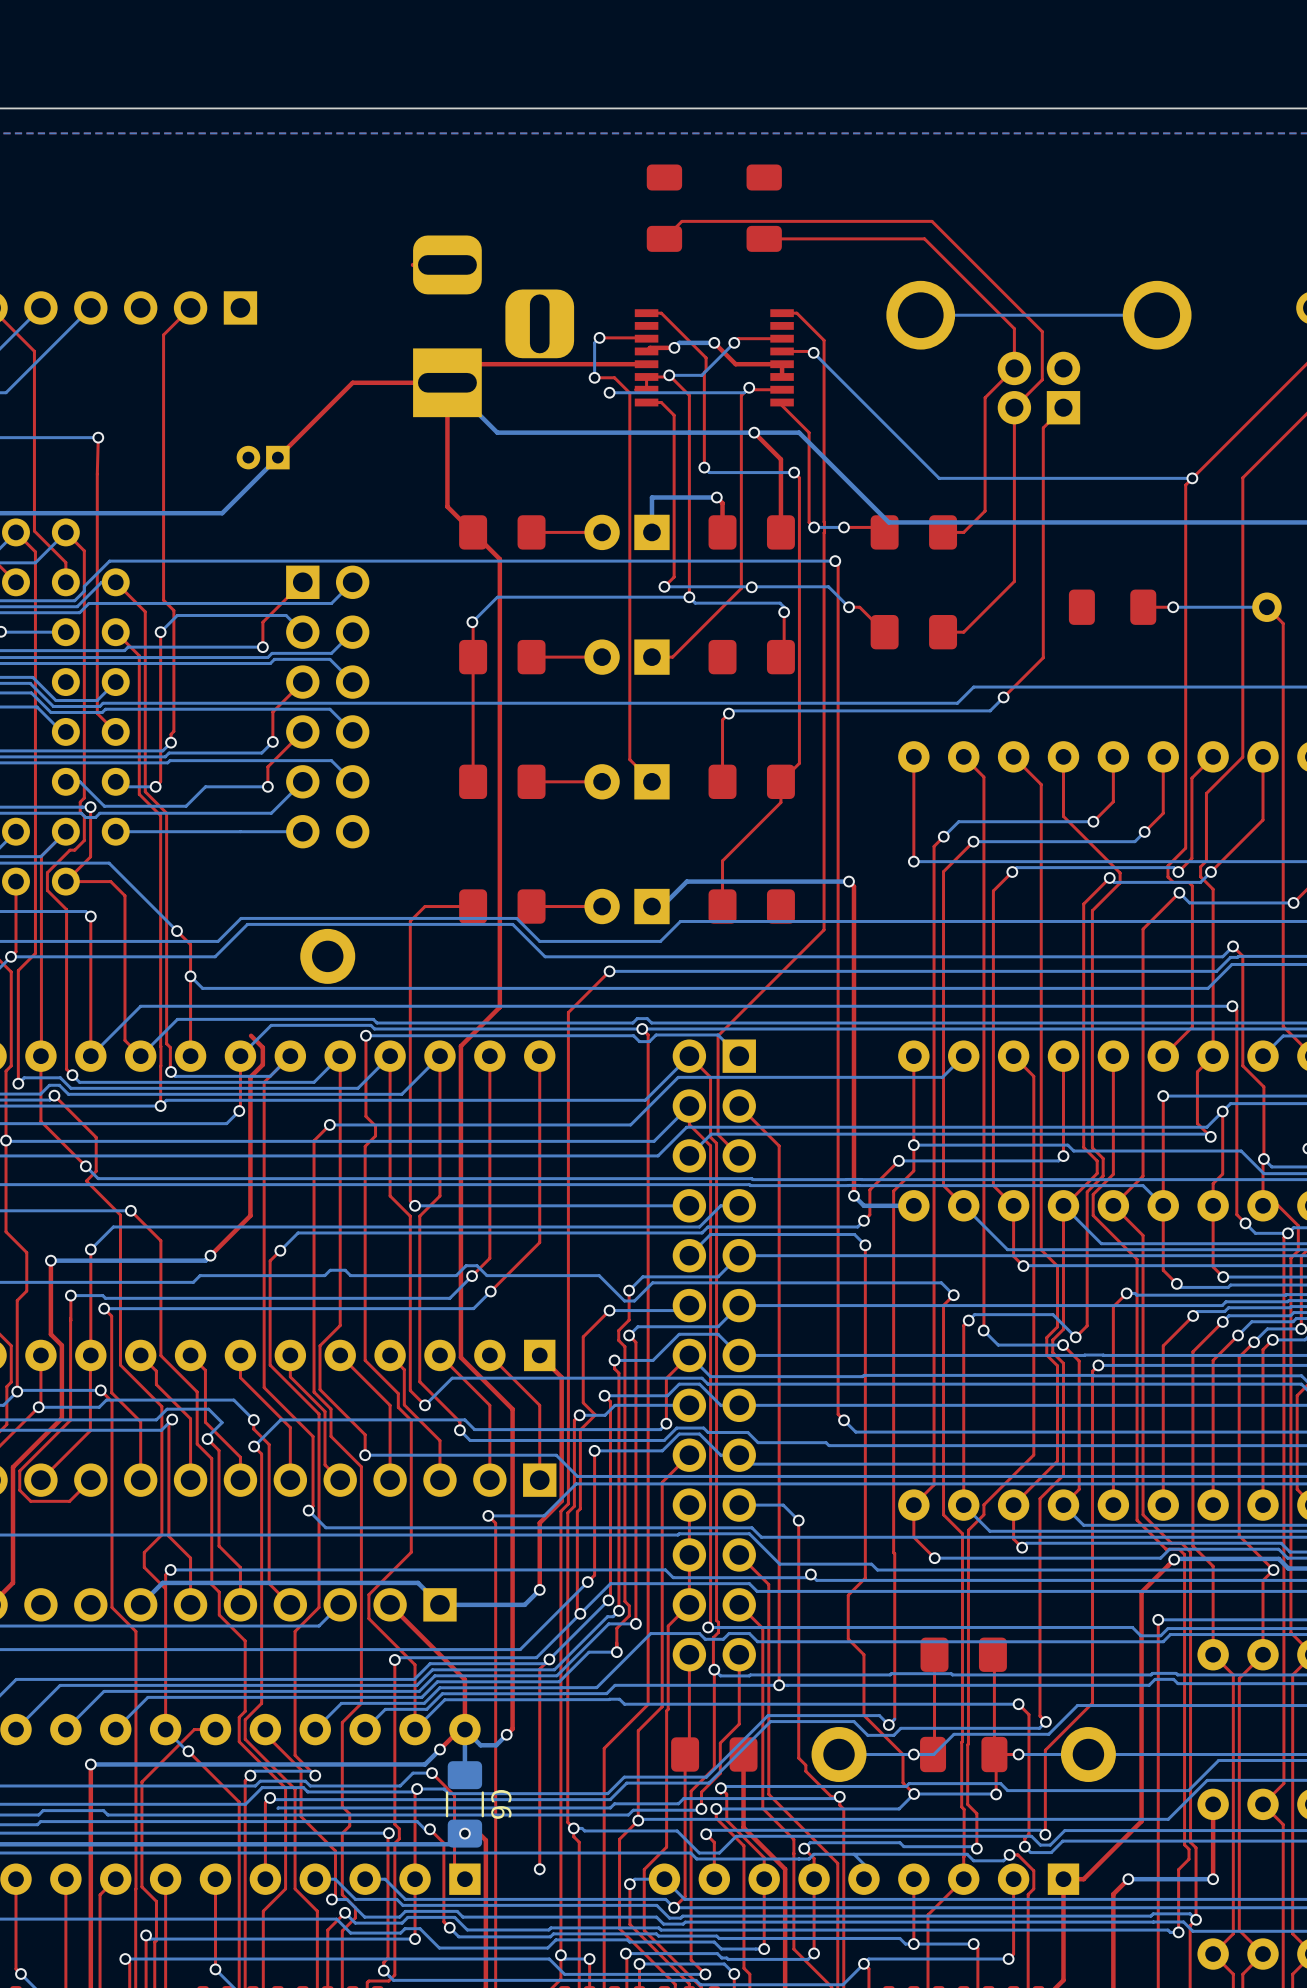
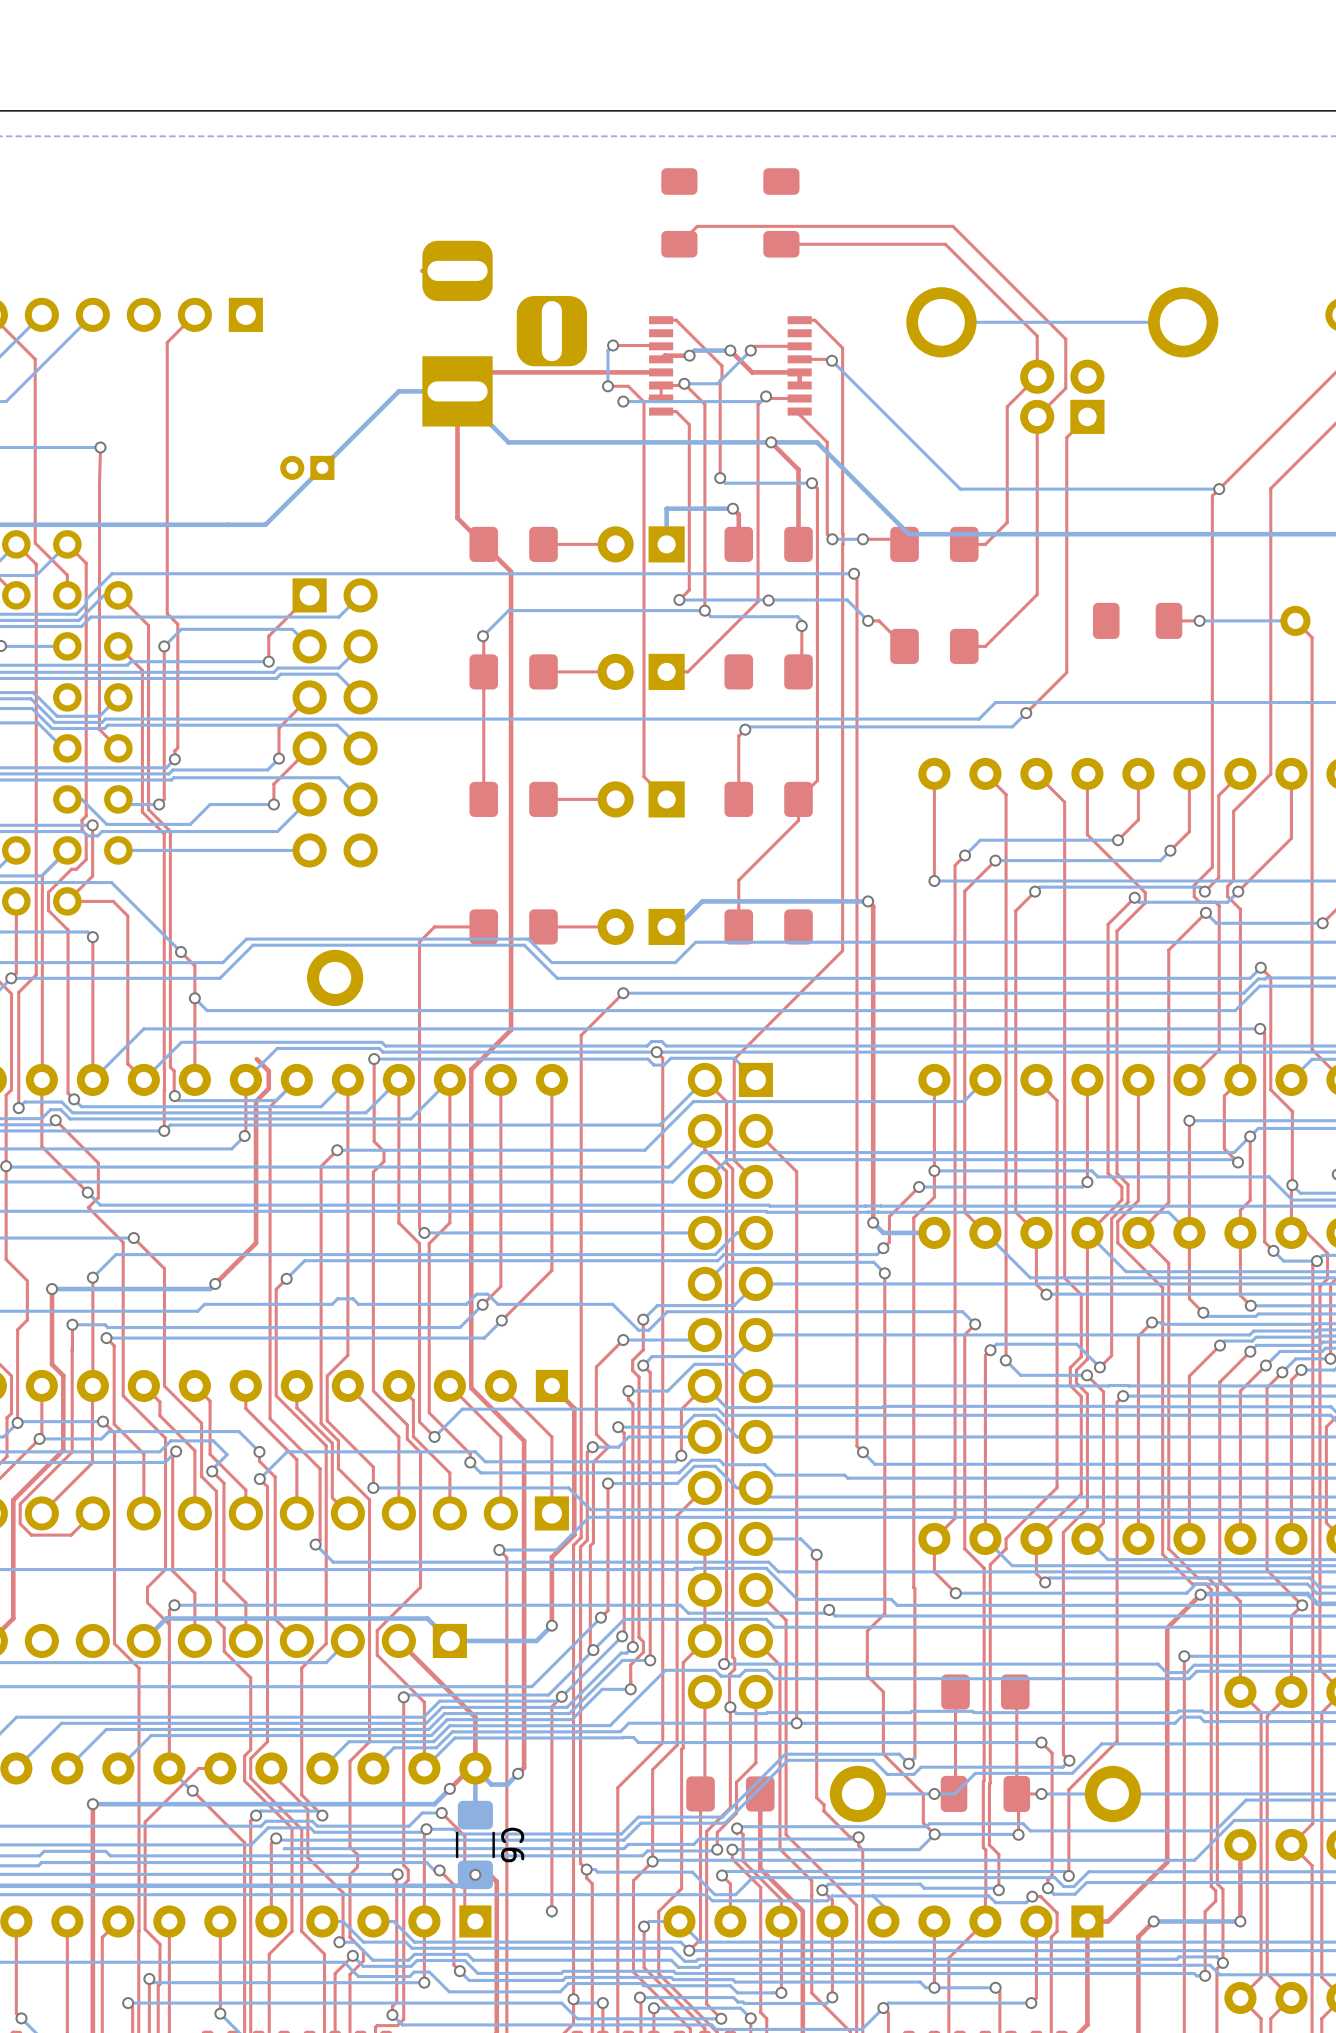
top track: (420, 382) (352, 382) (277, 457) -> none
part position: (263, 457) -> (307, 467)
bottom track: (277, 457) (222, 513) -> (457, 391) (398, 391) (265, 524) (227, 524)

